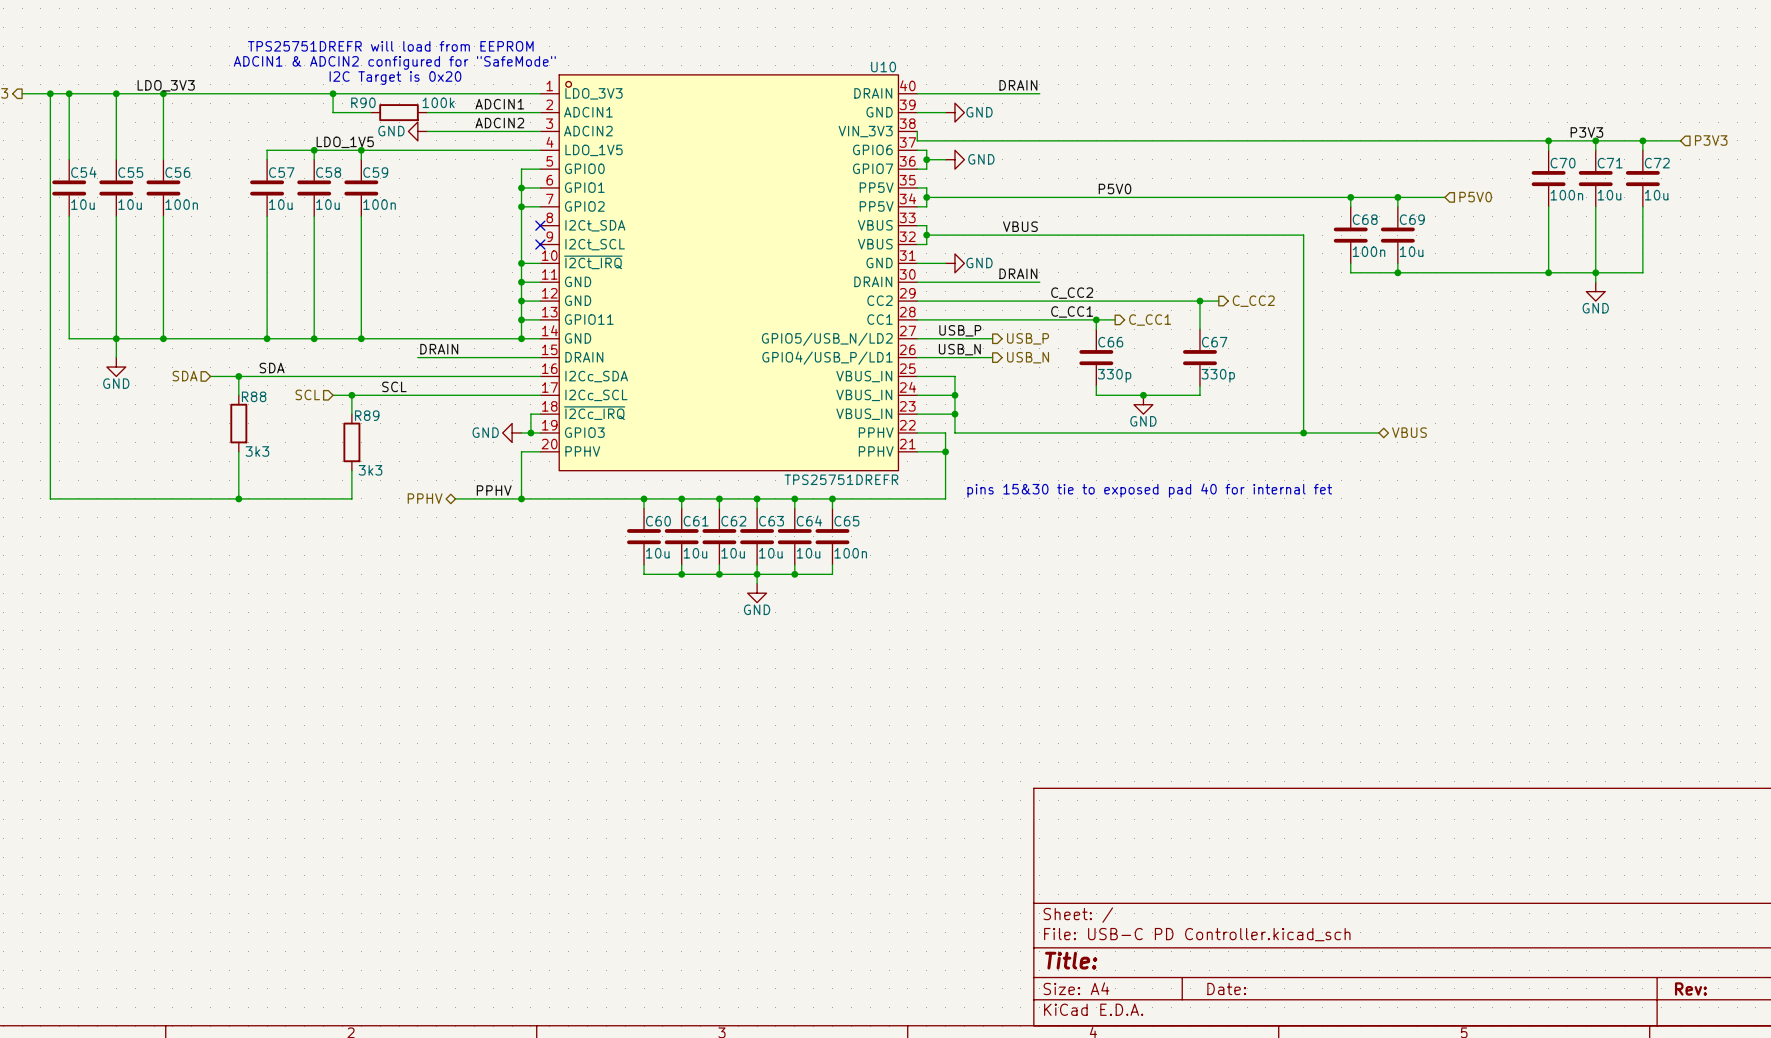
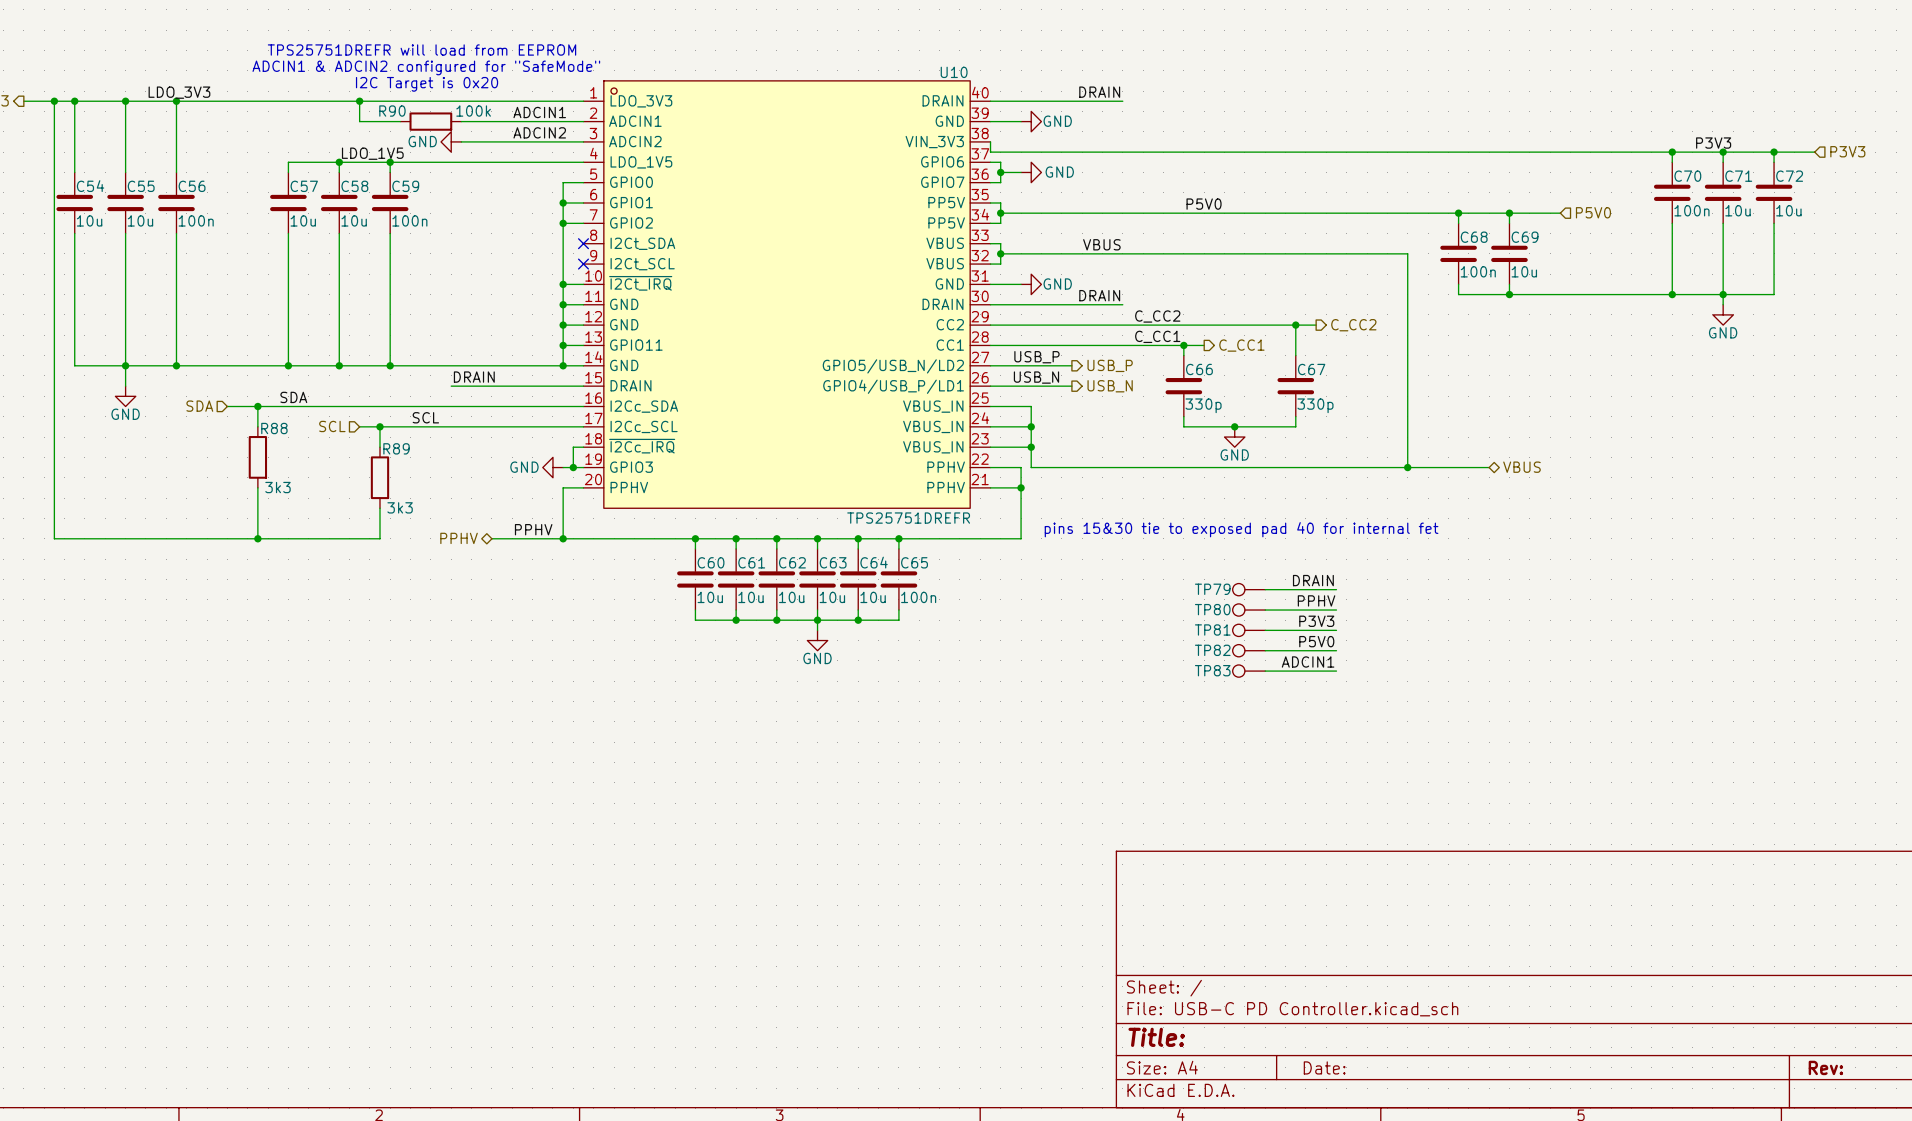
label: none -> DRAIN (1313, 580)
TP79: none -> (1248, 589)
wire: none -> (1265, 589) (1336, 589)
label: none -> PPHV (1316, 600)
TP80: none -> (1248, 610)
wire: none -> (1265, 610) (1336, 610)
label: none -> P3V3 (1316, 621)
TP81: none -> (1248, 630)
wire: none -> (1265, 630) (1336, 630)
label: none -> P5V0 (1316, 641)
TP82: none -> (1248, 650)
wire: none -> (1265, 650) (1336, 650)
label: none -> ADCIN1 (1308, 661)
TP83: none -> (1248, 671)
wire: none -> (1265, 671) (1336, 671)

